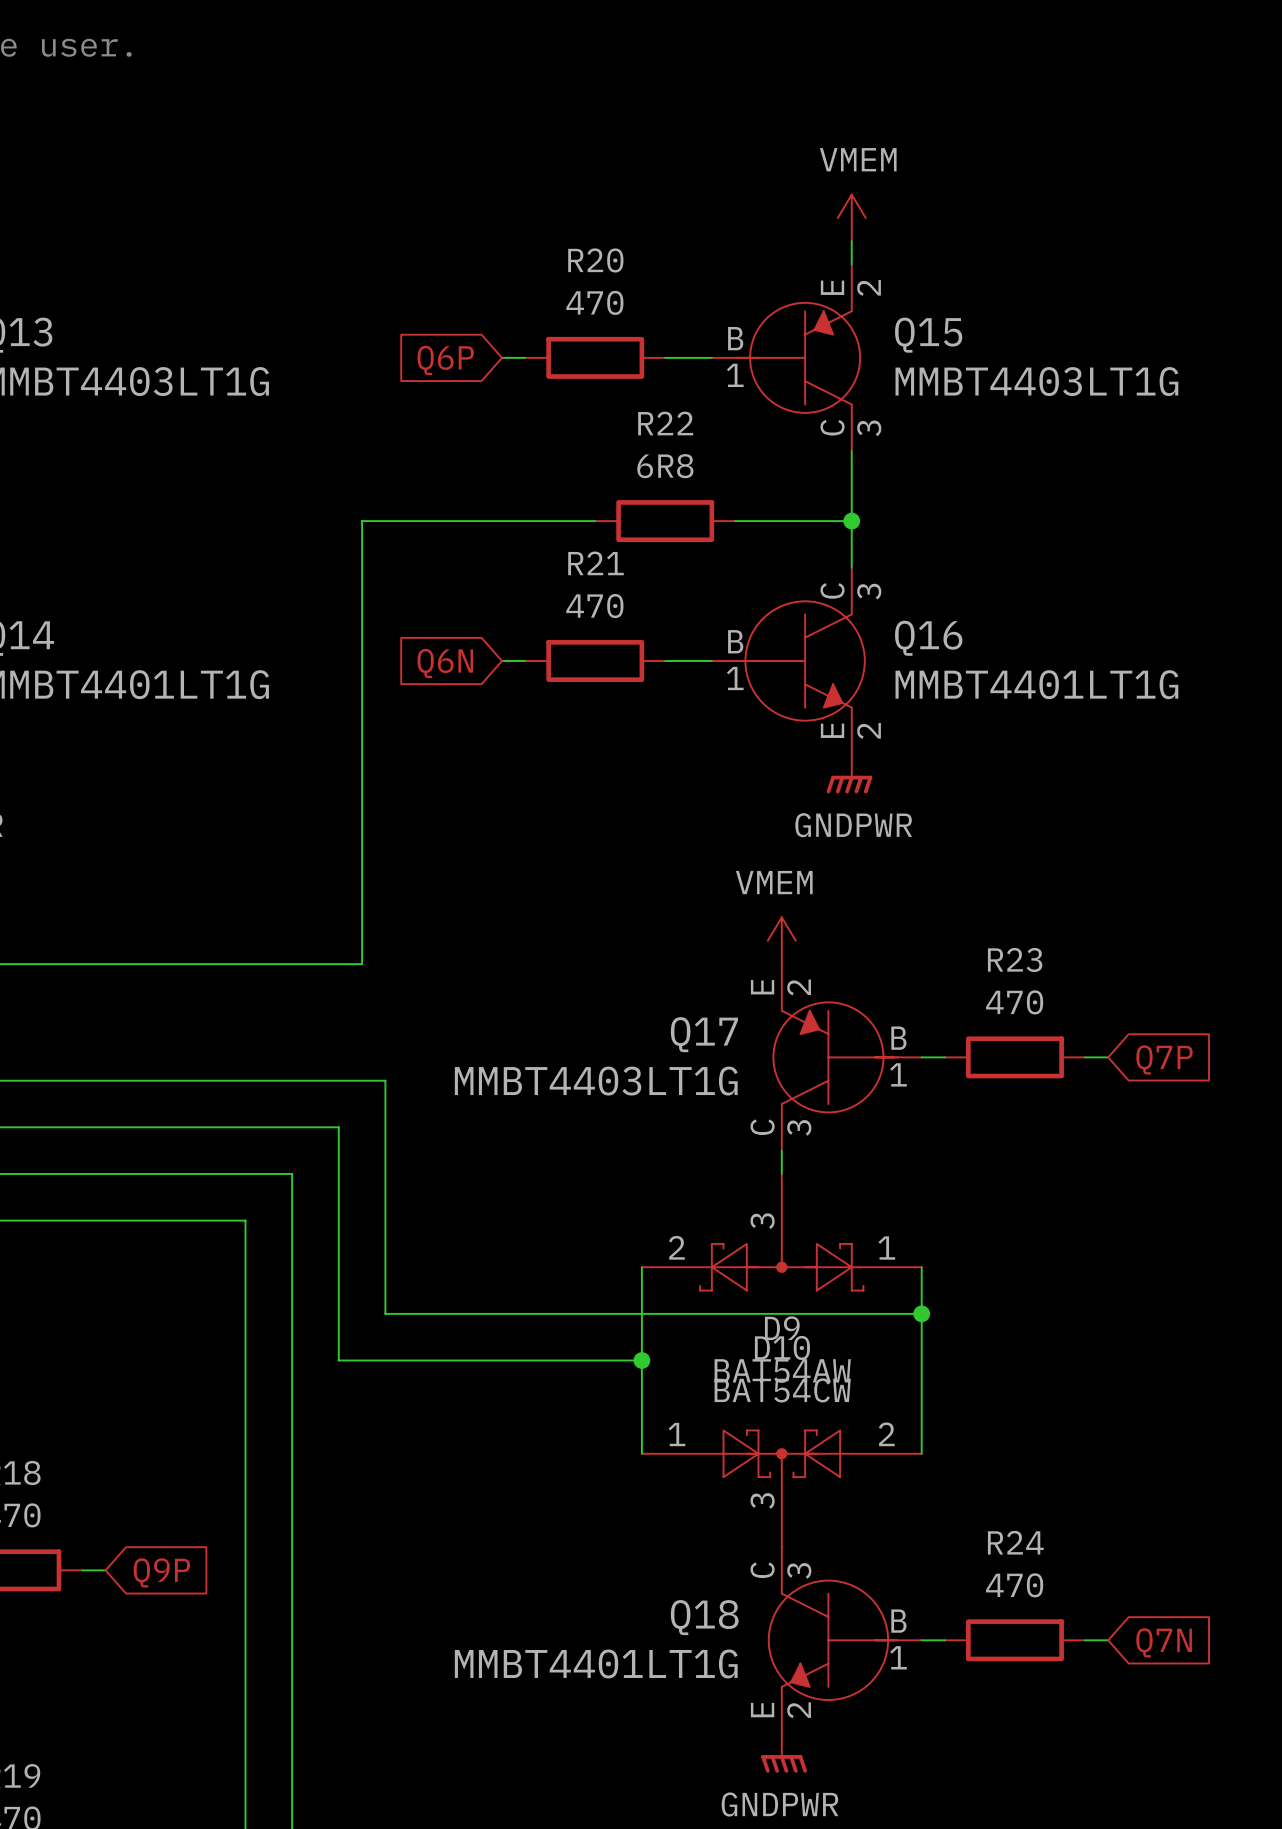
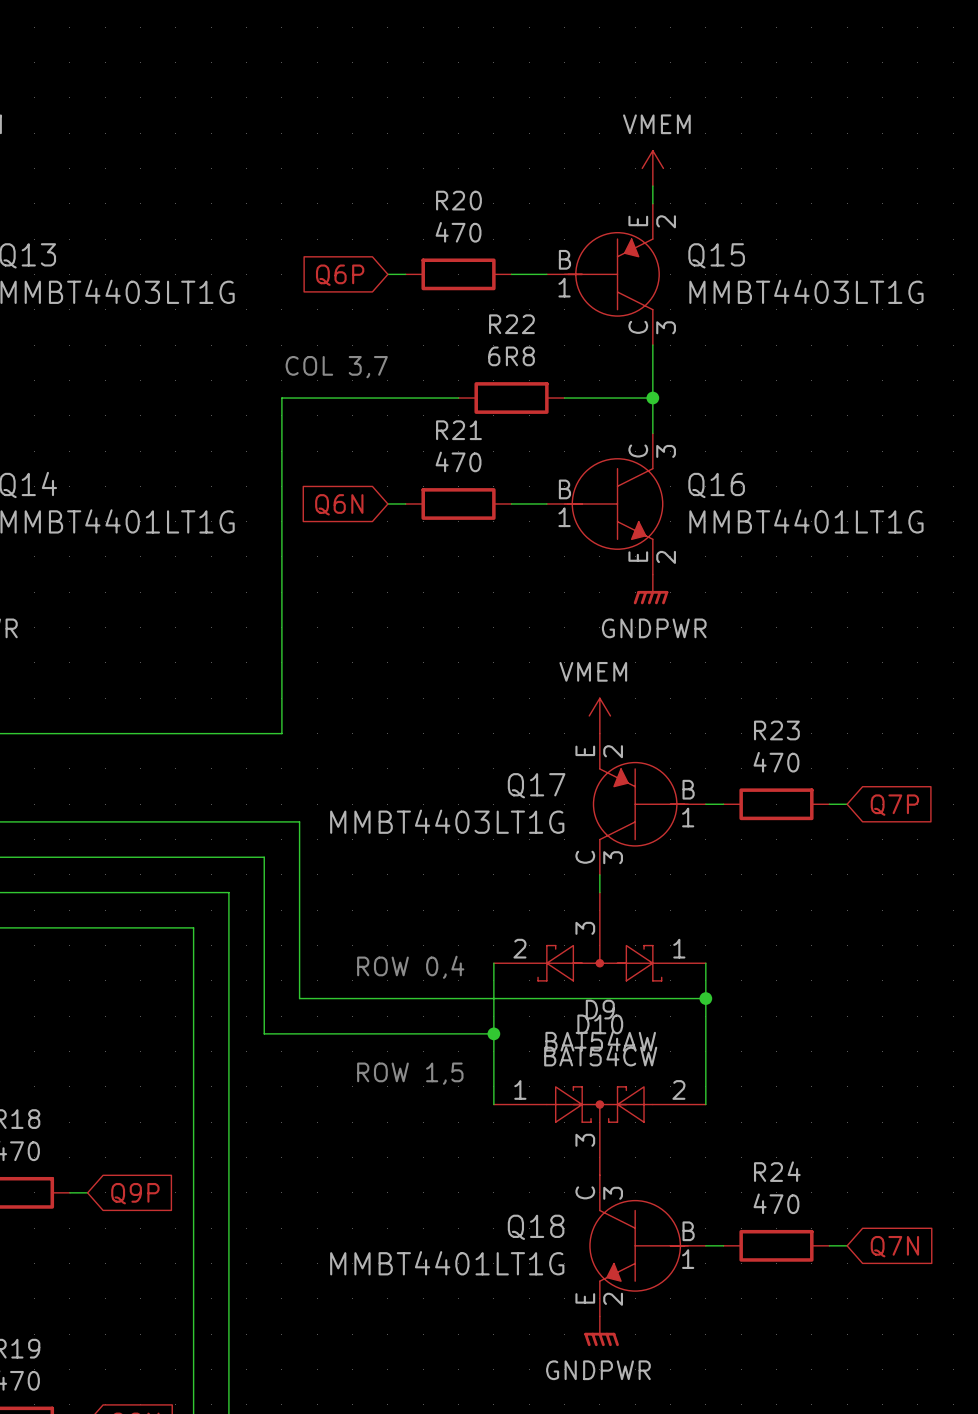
text: none -> COL 3,7 (336, 367)
text: none -> ROW 0,4 (410, 967)
text: none -> ROW 1,5 (410, 1073)

